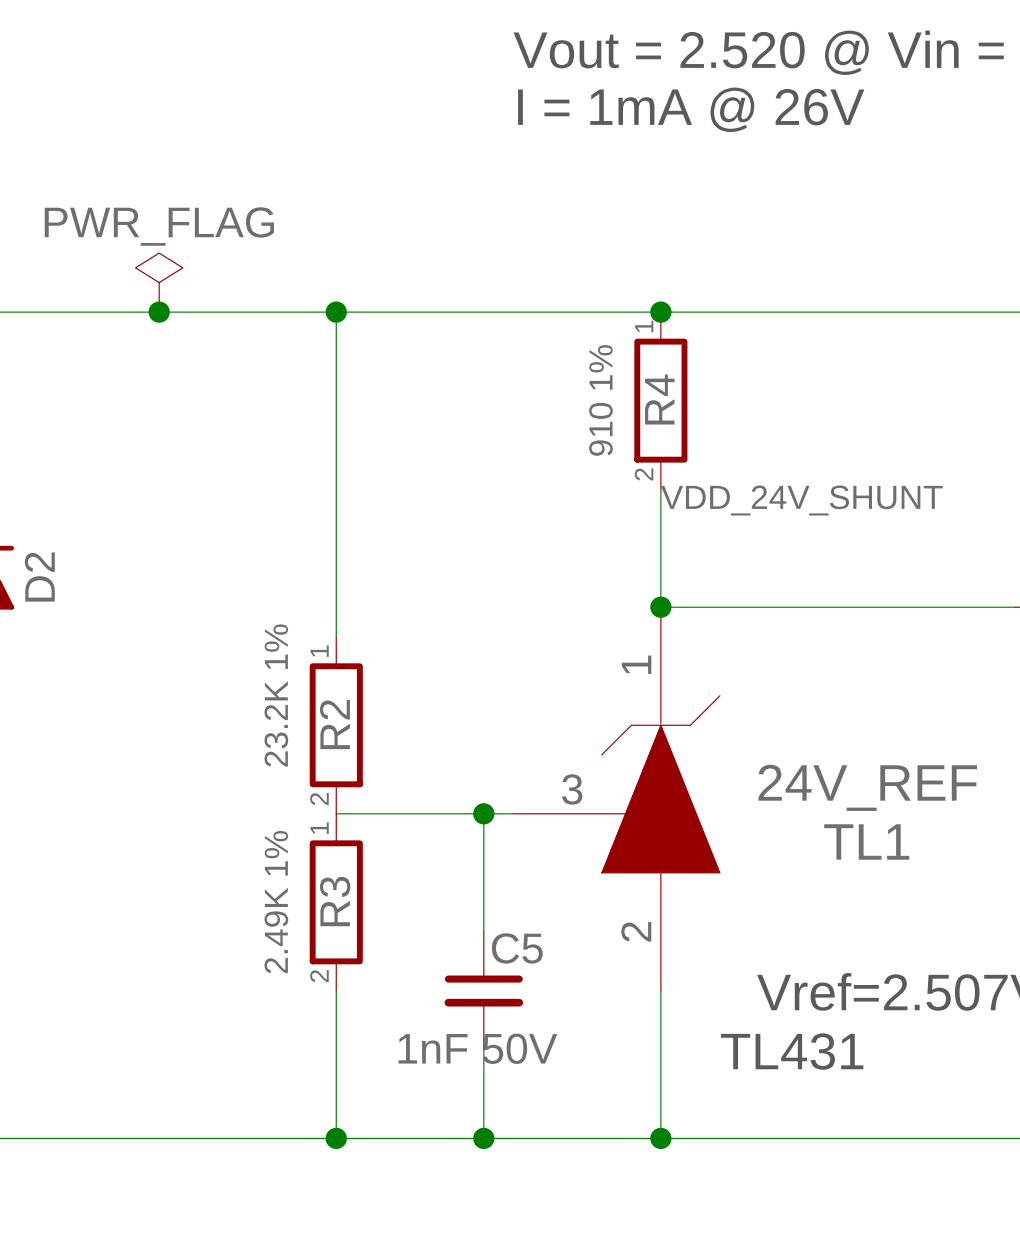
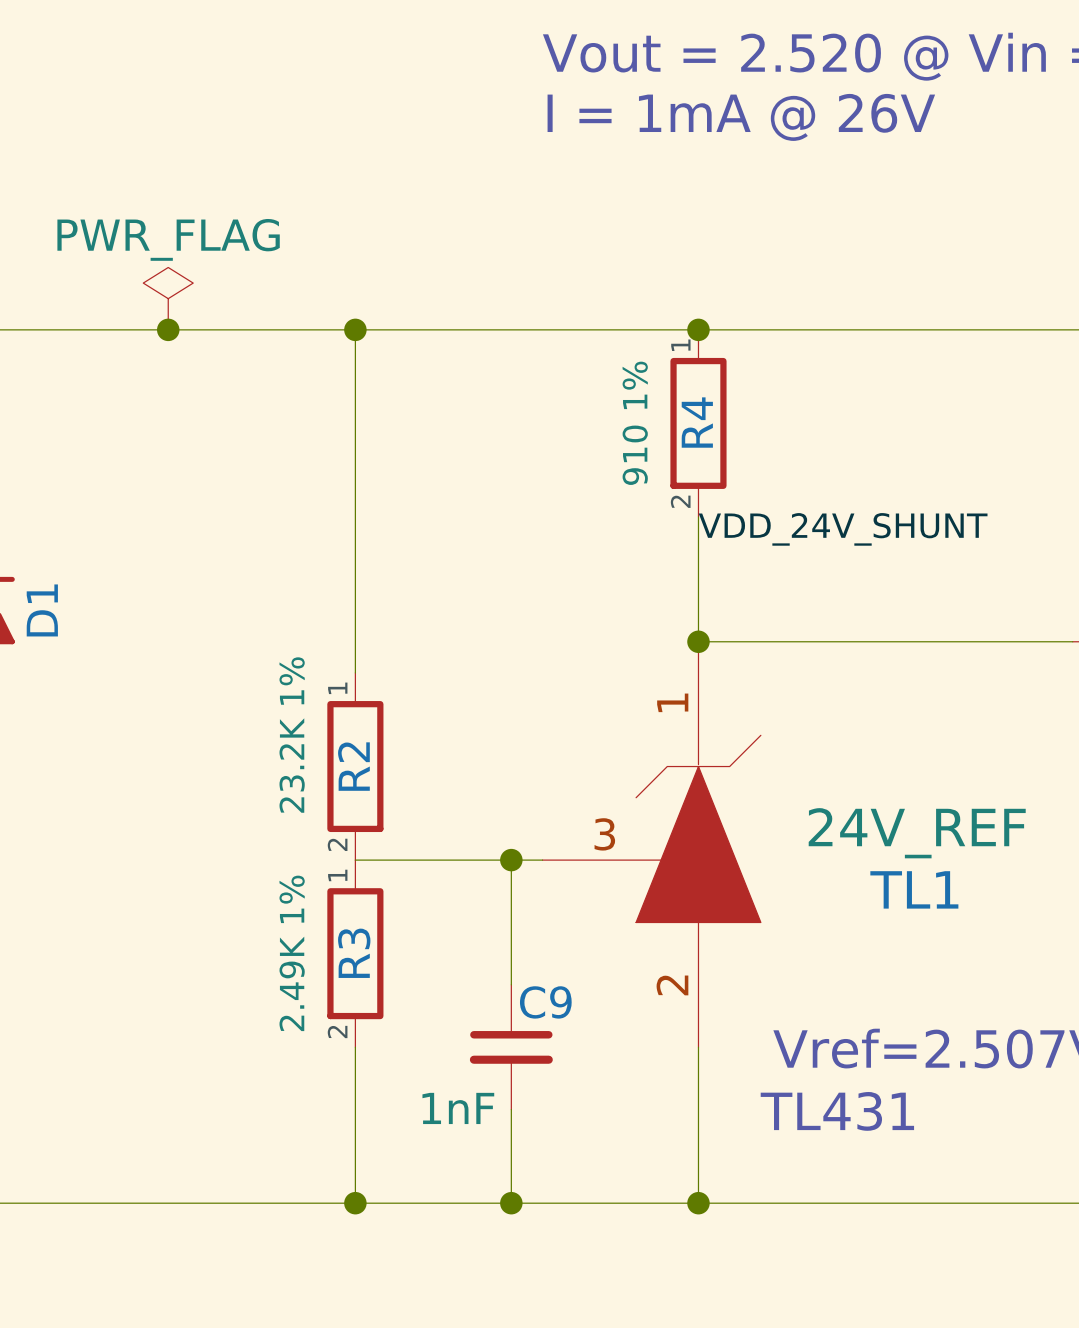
D2 name: D2 (39, 577) -> D1 (42, 610)
C5 name: C5 (517, 948) -> C9 (545, 1002)
C5 value: 1nF 50V (477, 1048) -> 1nF (458, 1108)

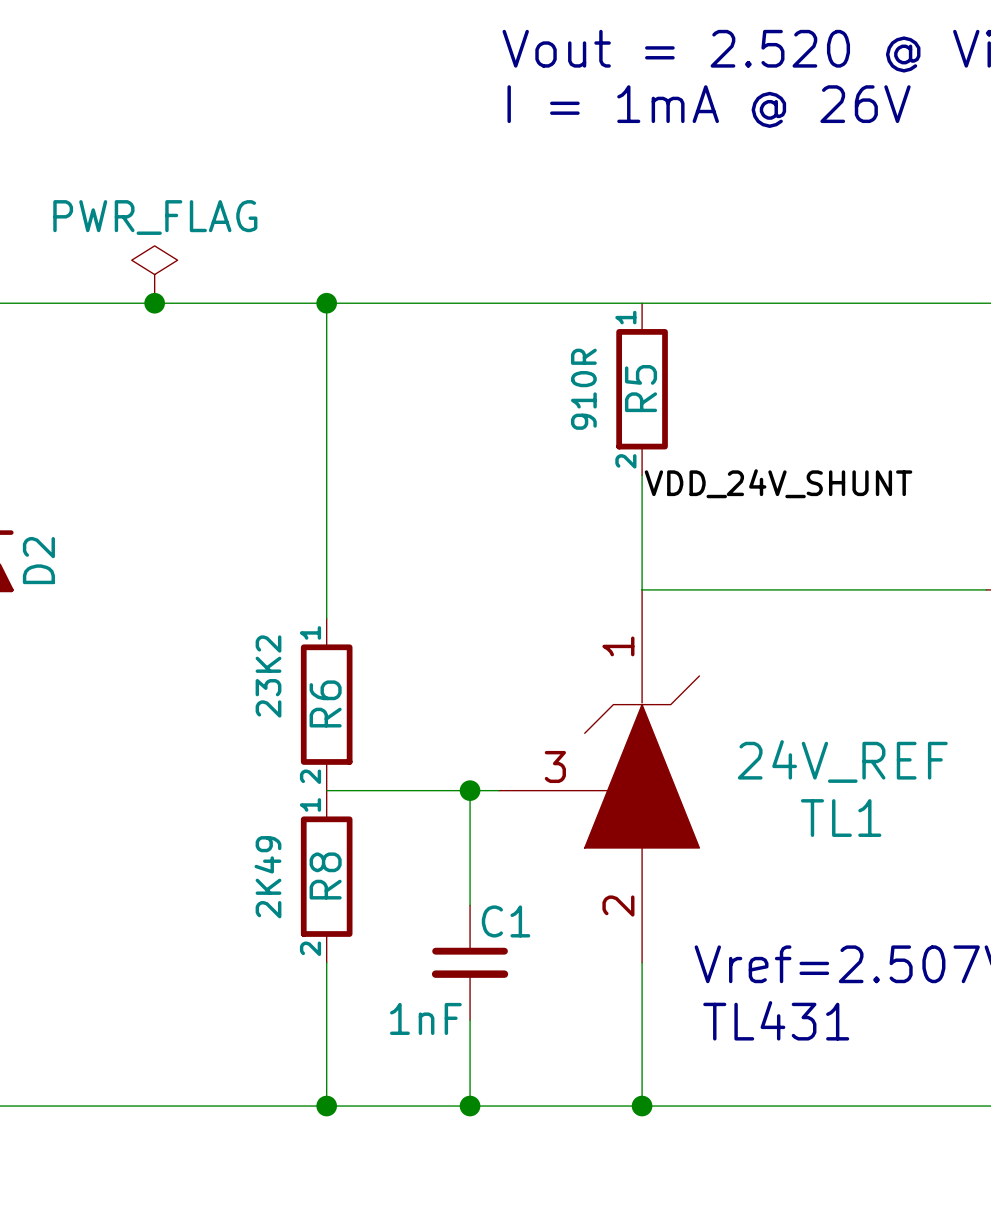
junction: (698, 329) -> none
R4 name: R4 (697, 422) -> R5 (641, 388)
R4 value: 910 1% (635, 423) -> 910R (583, 389)
D1 name: D1 (42, 610) -> D2 (38, 560)
junction: (698, 641) -> none
R2 value: 23.2K 1% (292, 735) -> 23K2 (268, 676)
R2 name: R2 (353, 766) -> R6 (325, 703)
R3 value: 2.49K 1% (292, 953) -> 2K49 (267, 877)
R3 name: R3 (354, 953) -> R8 (325, 875)
C9 name: C9 (545, 1002) -> C1 (506, 921)

